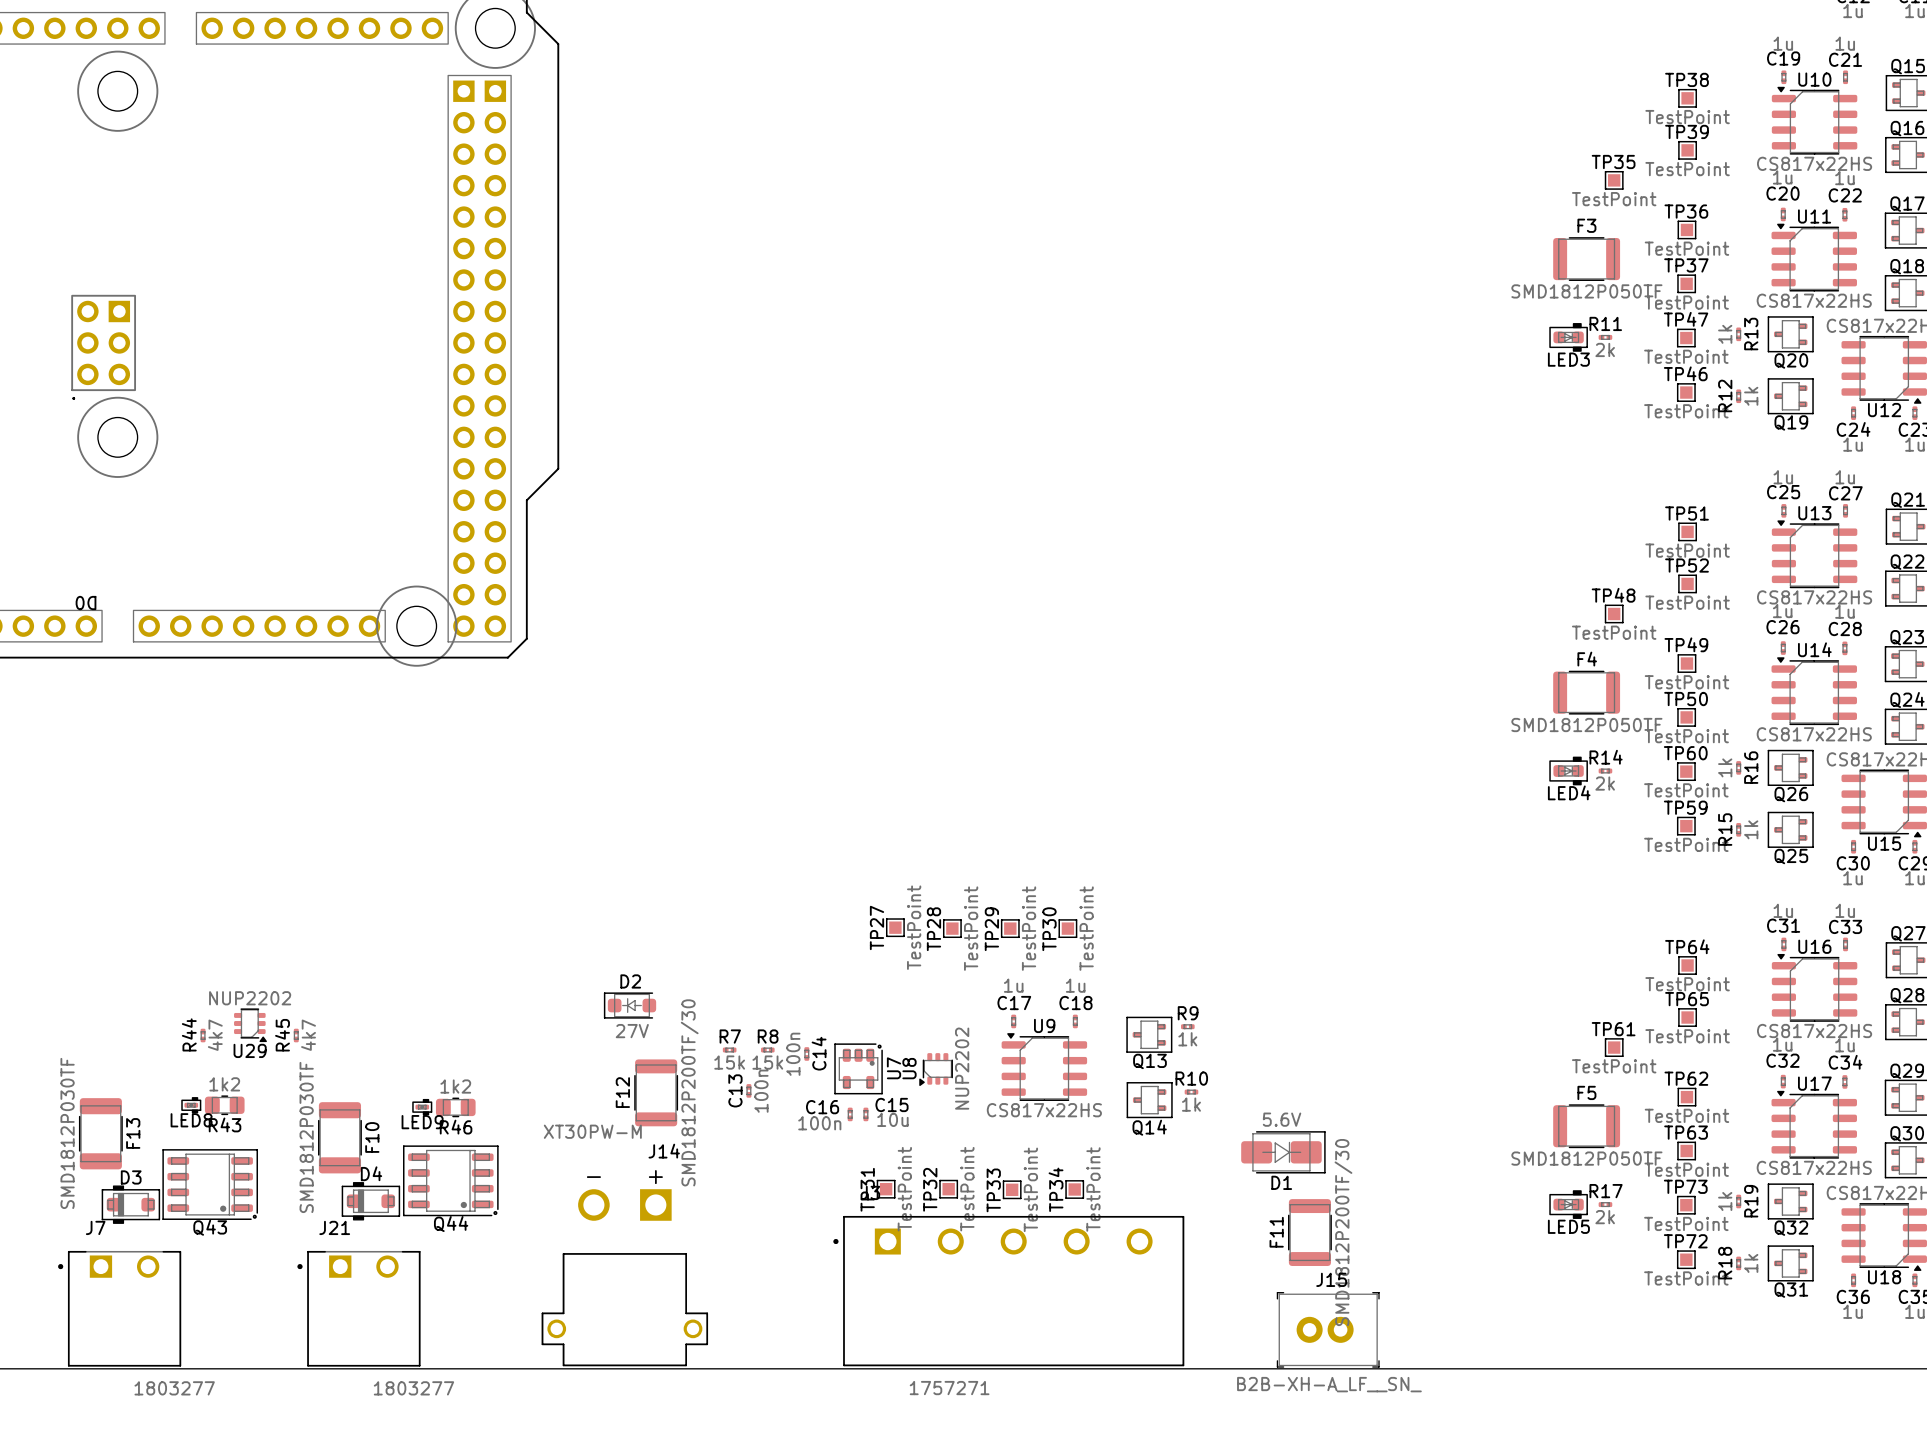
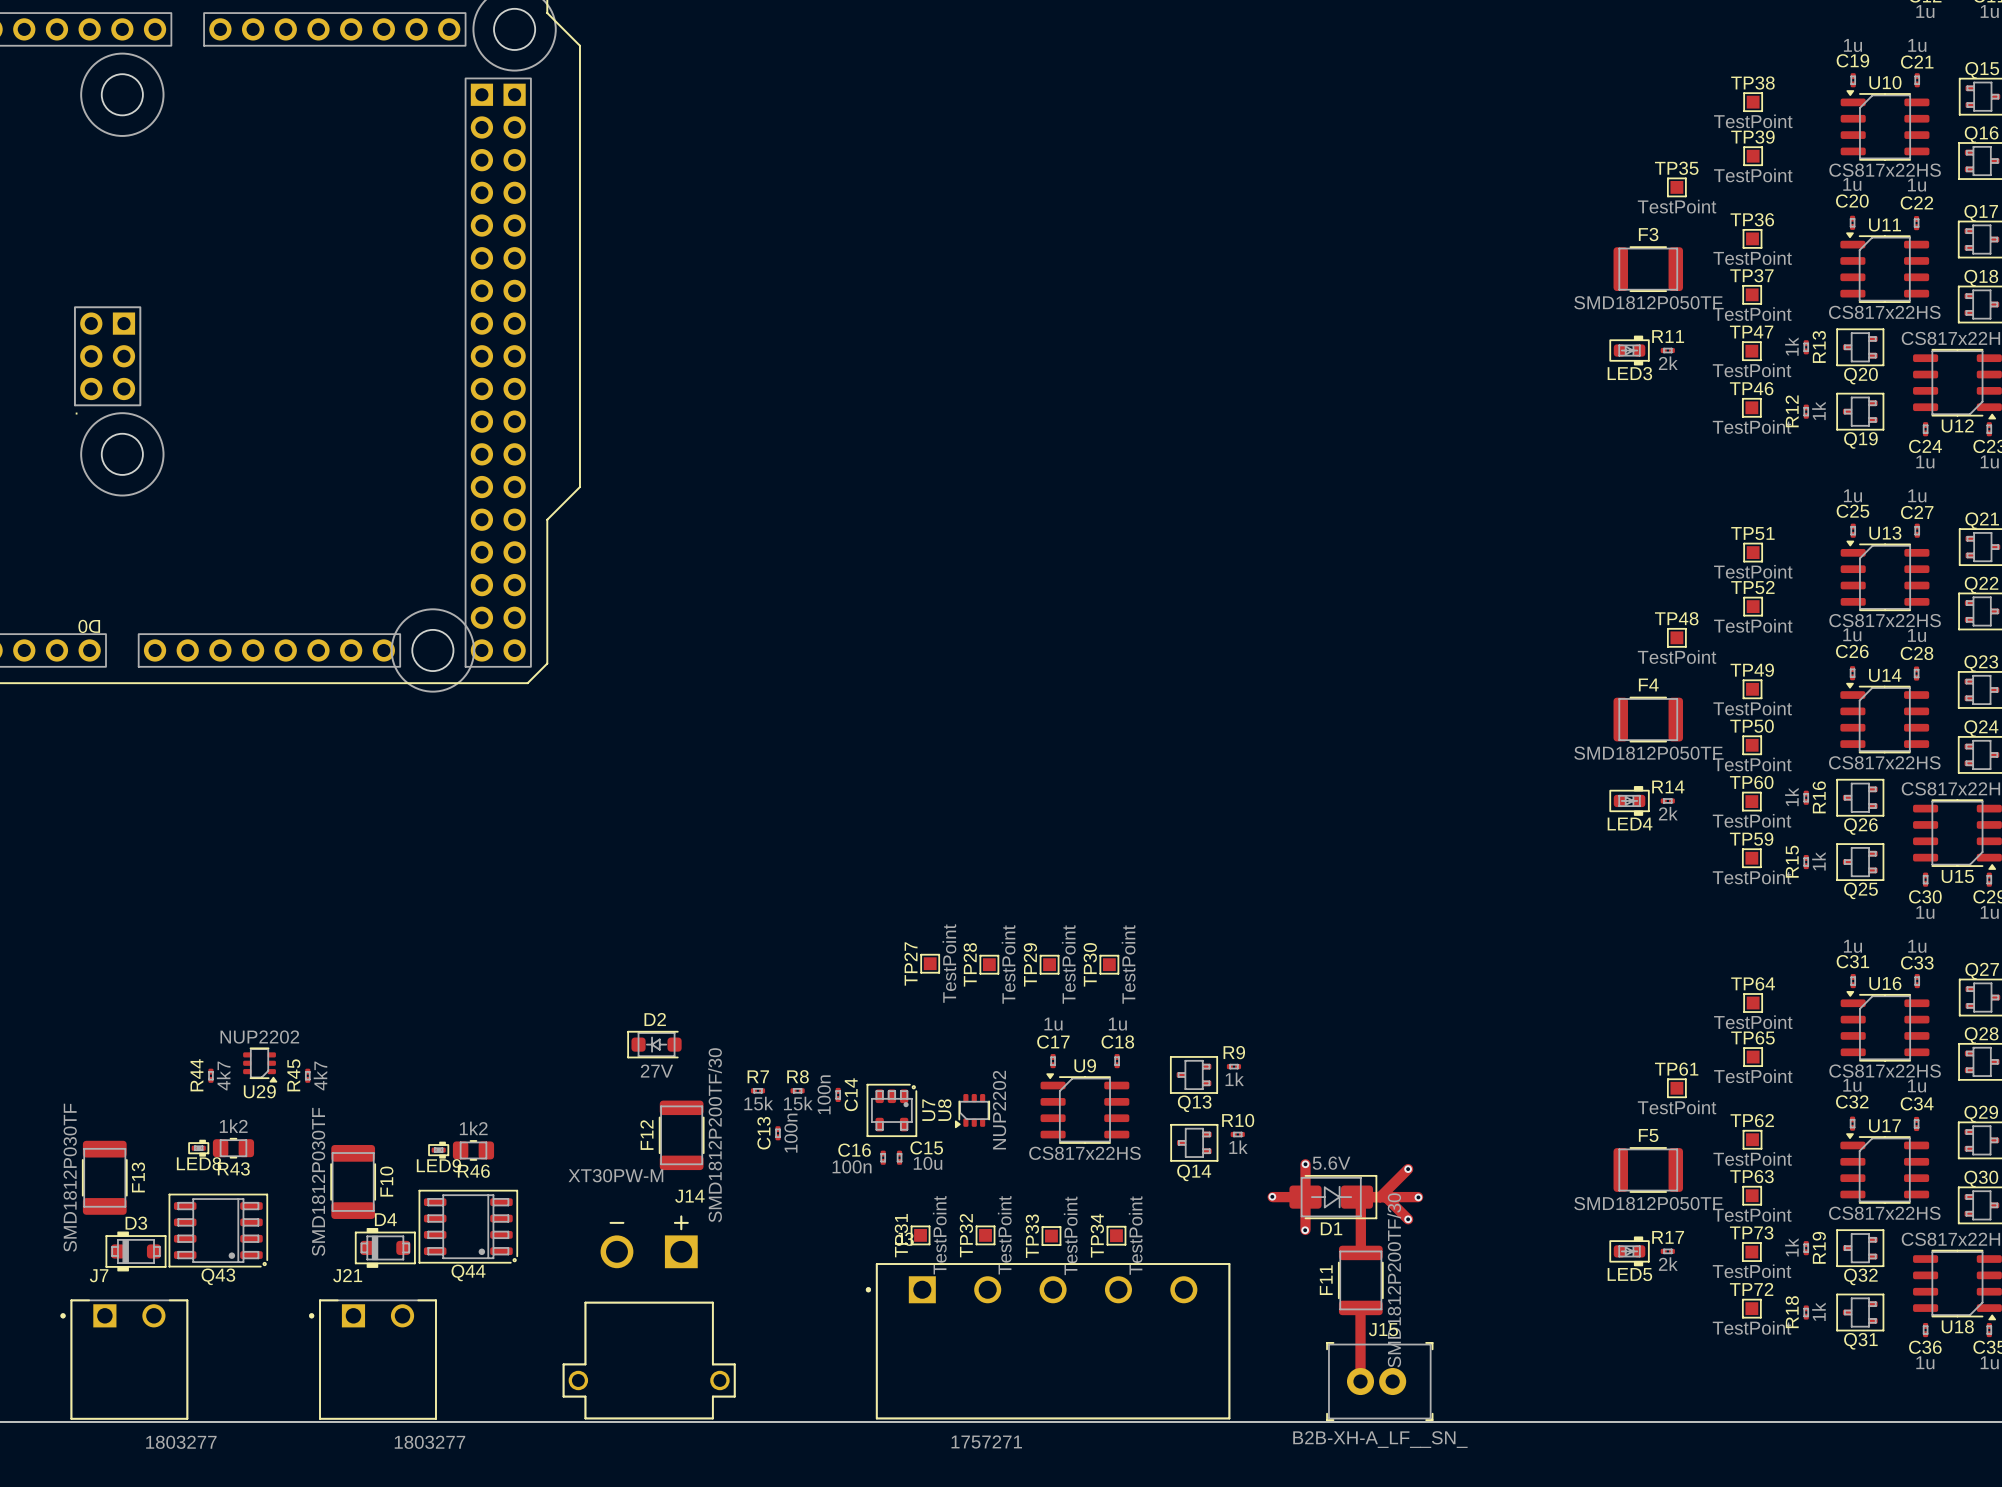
track: none -> (1305, 1164) (1305, 1229)
via: none -> (1305, 1164)
track: none -> (1408, 1169) (1380, 1197)
via: none -> (1408, 1169)
via: none -> (1272, 1196)
track: none -> (1272, 1197) (1305, 1197)
track: none -> (1385, 1197) (1408, 1219)
track: none -> (1418, 1197) (1356, 1197) (1360, 1200) (1360, 1252)
via: none -> (1418, 1197)
via: none -> (1408, 1219)
via: none -> (1305, 1230)
track: none -> (1360, 1307) (1360, 1381)

